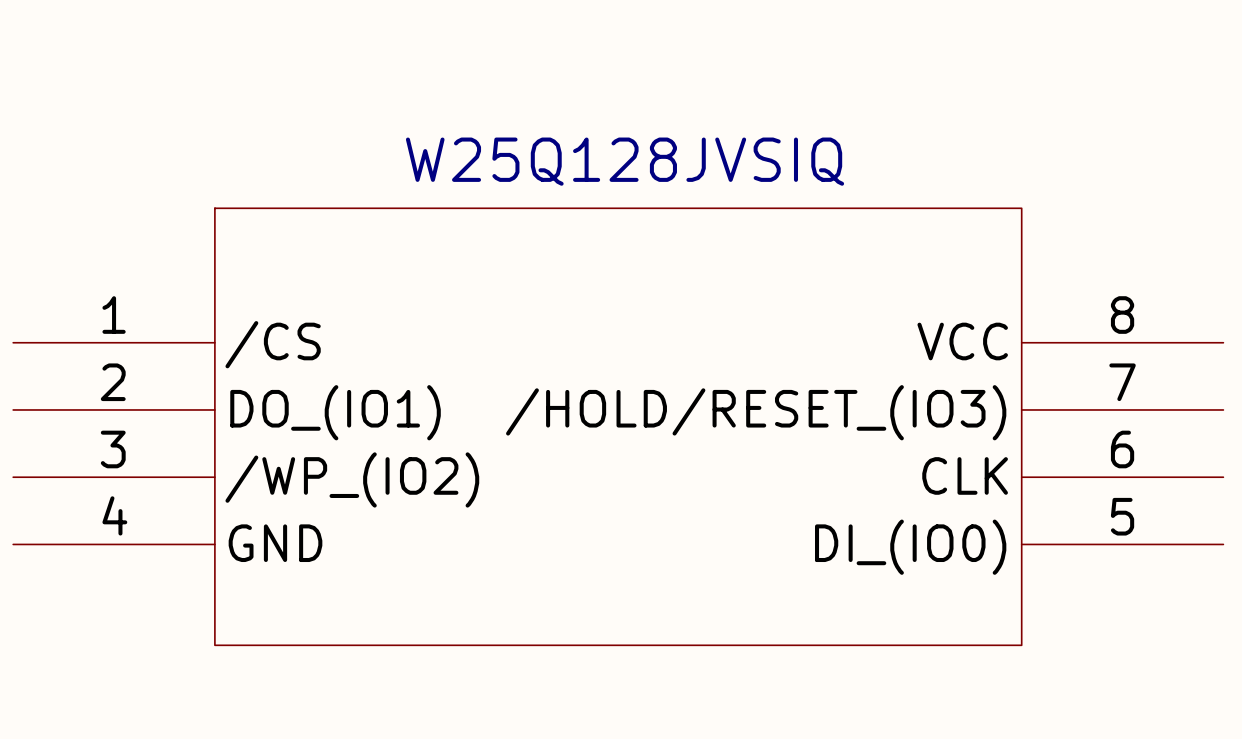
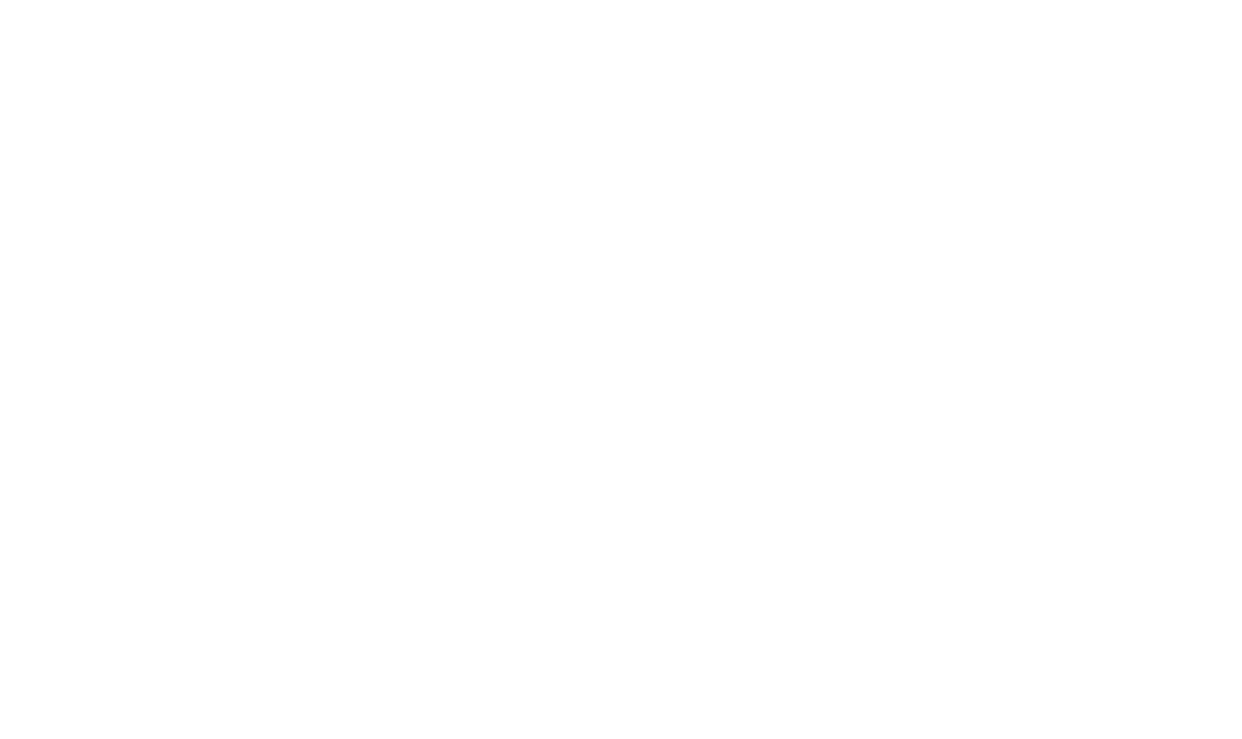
part: W25Q128JVSIQ (618, 426) -> none

